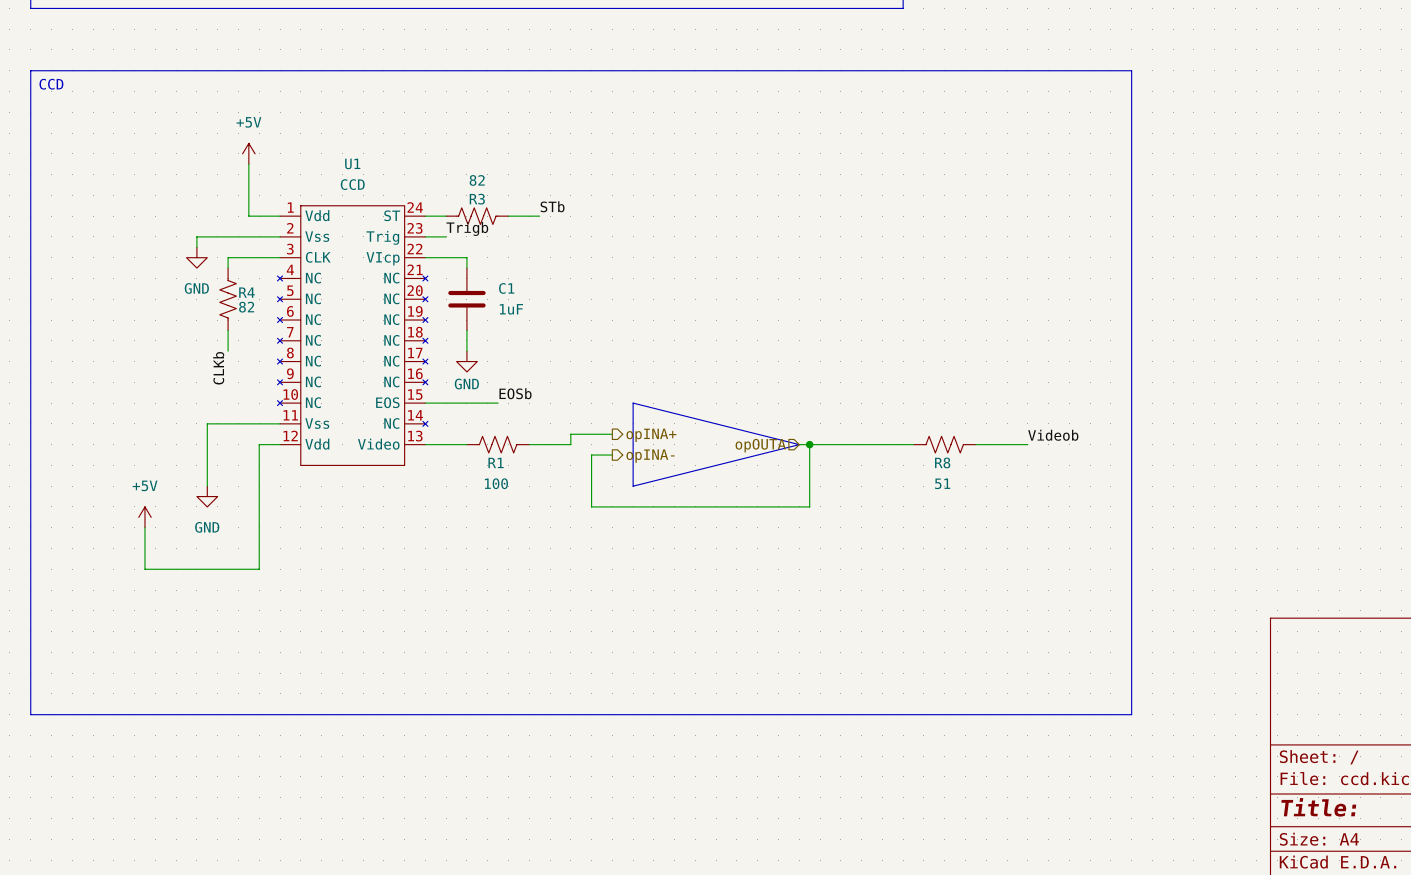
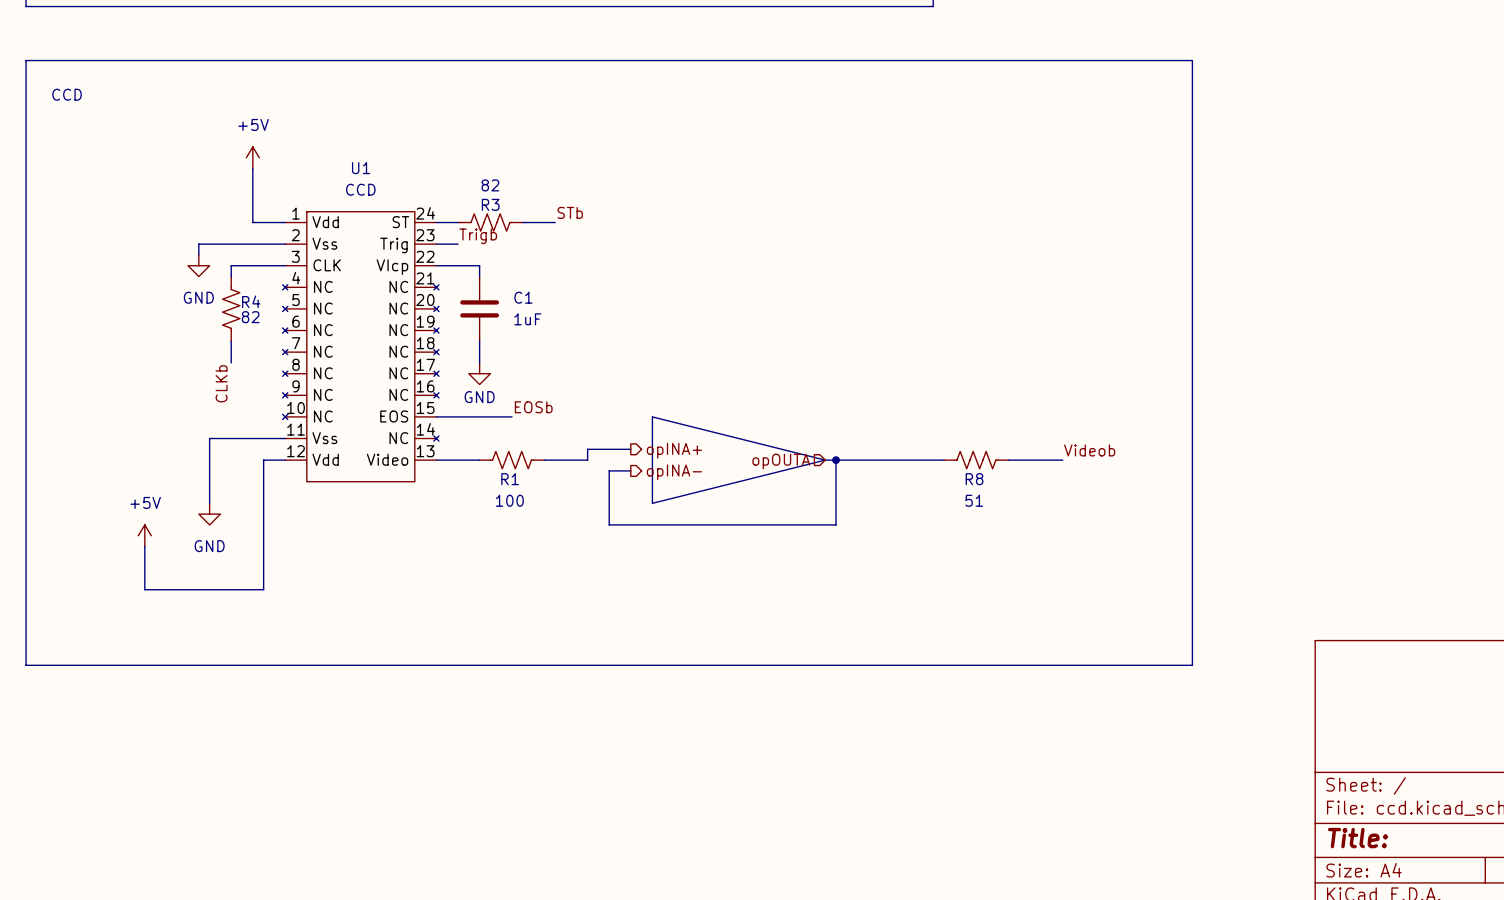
line: (30, 70) (1131, 70) (1131, 714) (30, 714) (30, 641) -> (26, 71) (26, 60) (1192, 60) (1192, 665) (26, 665)
text position: CCD (51, 84) -> CCD (67, 94)

